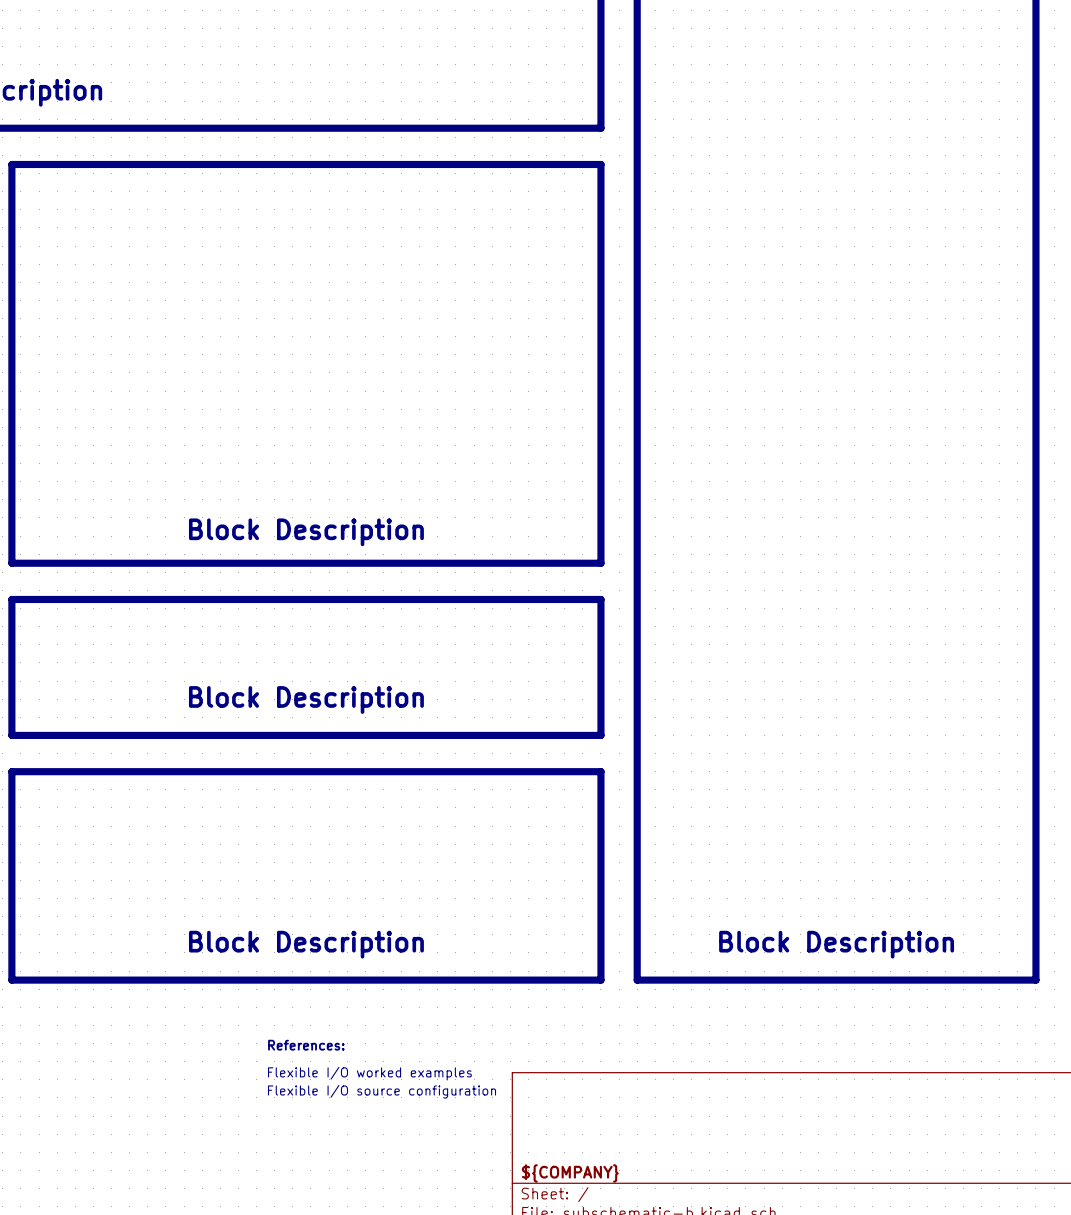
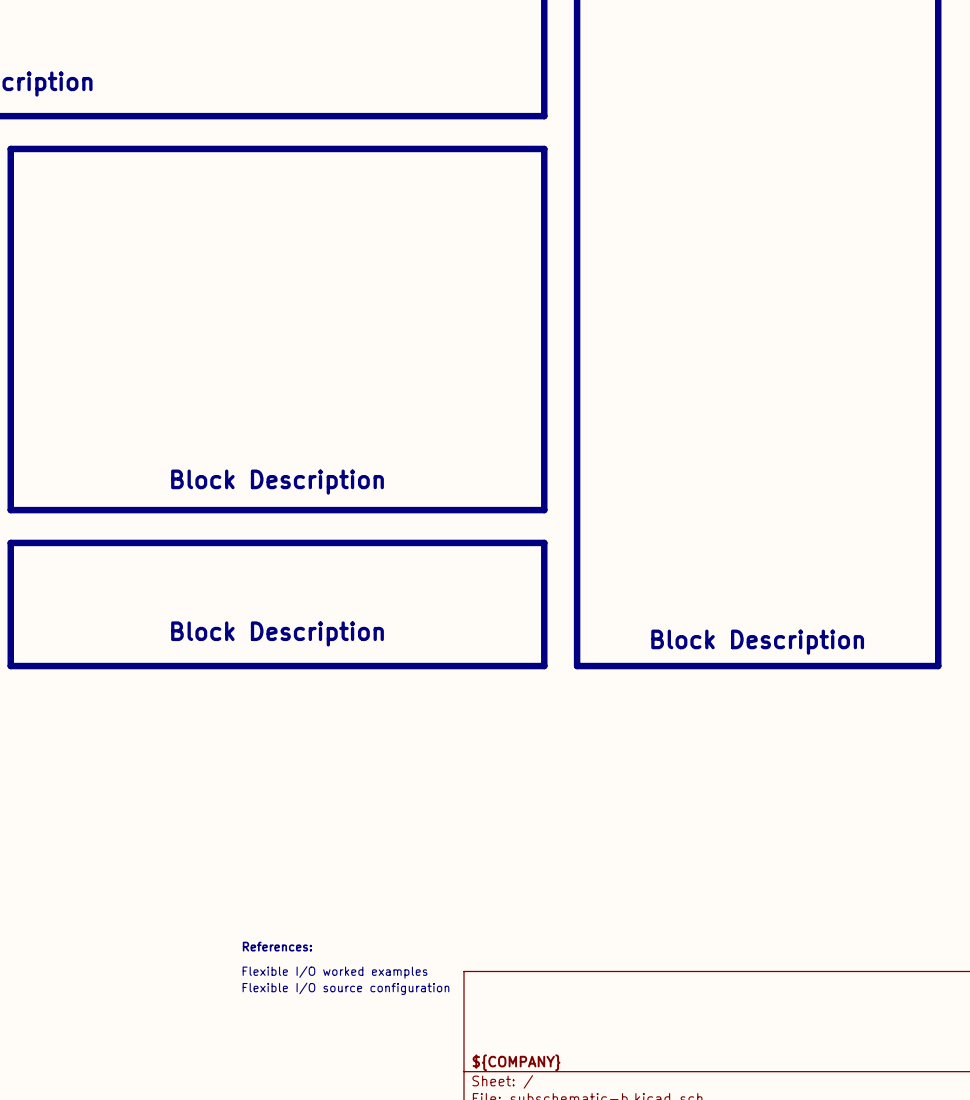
text: none -> Block Description (757, 642)
line: (637, 735) (637, 980) (1035, 980) (1035, 735) -> (577, 666) (938, 666)
line: (11, 771) (11, 980) (600, 980) (600, 771) (11, 771) -> none
text: Block Description (306, 944) -> none
text: Block Description (836, 944) -> none

